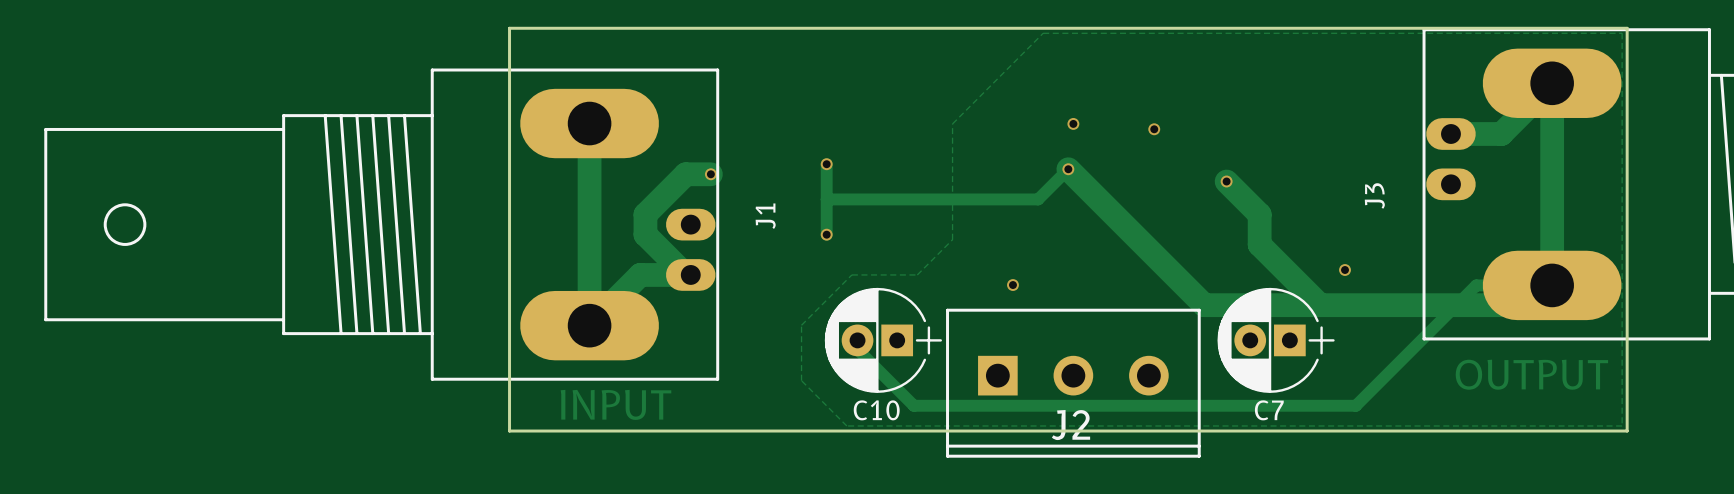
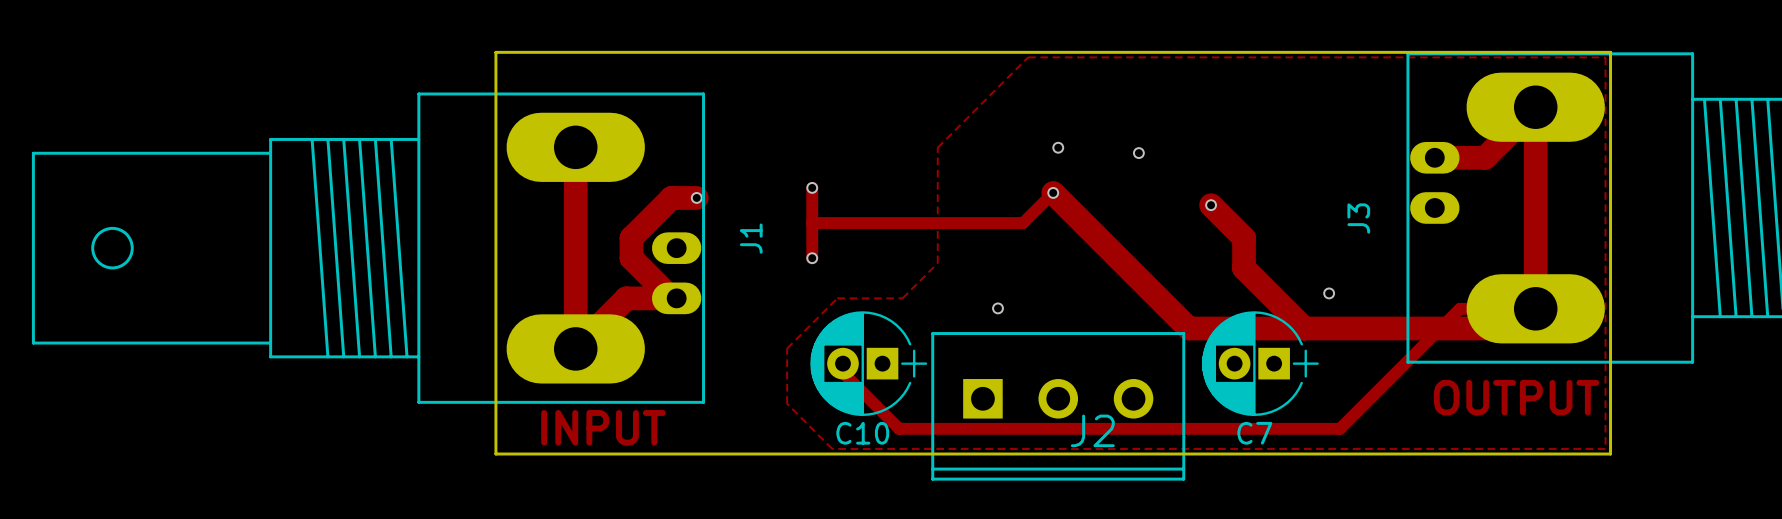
J2 name position: J2 (1070, 425) -> J2 (1092, 430)

